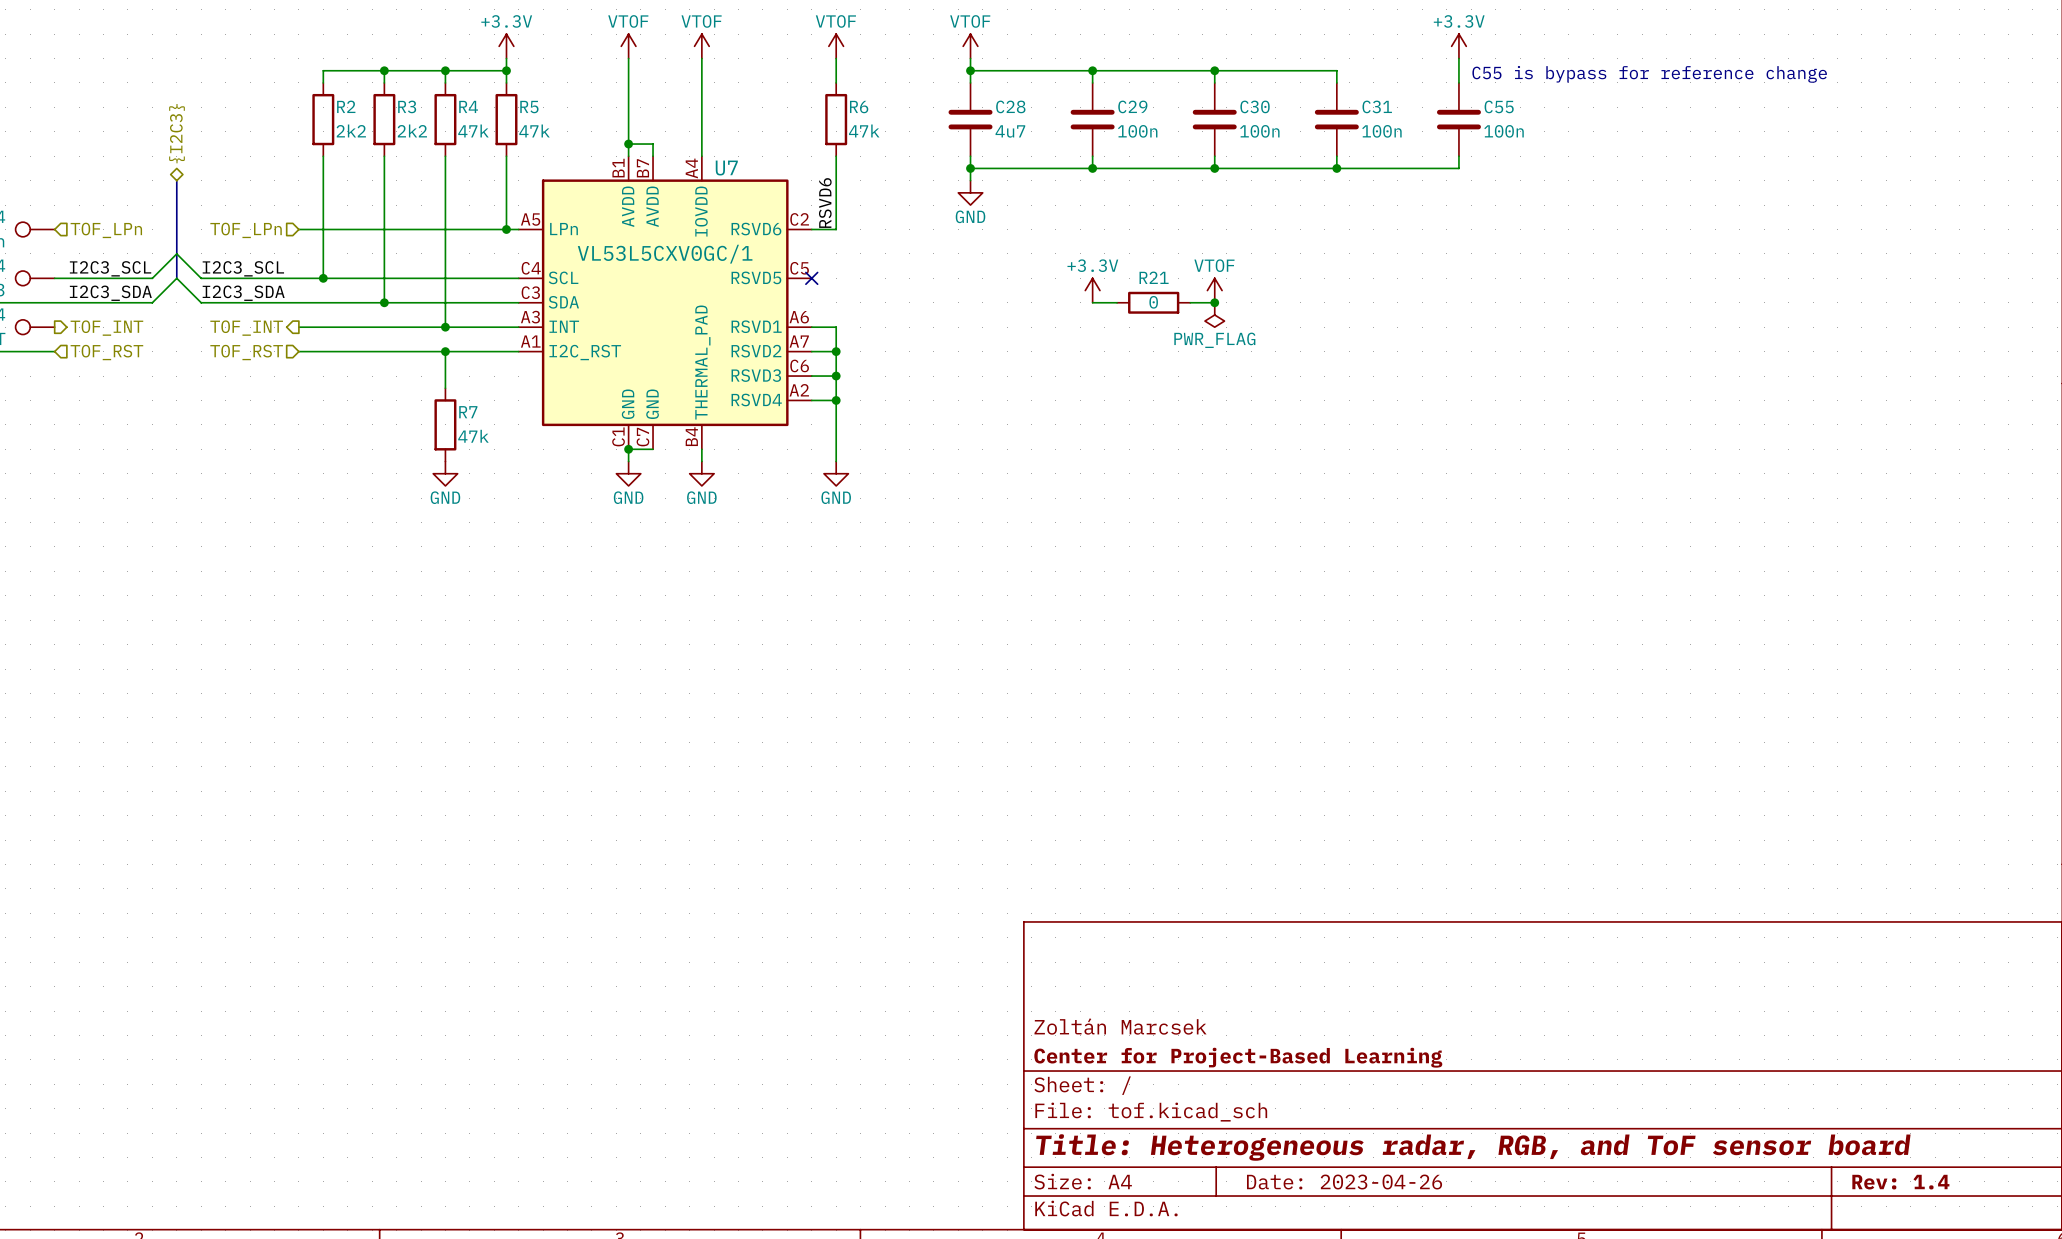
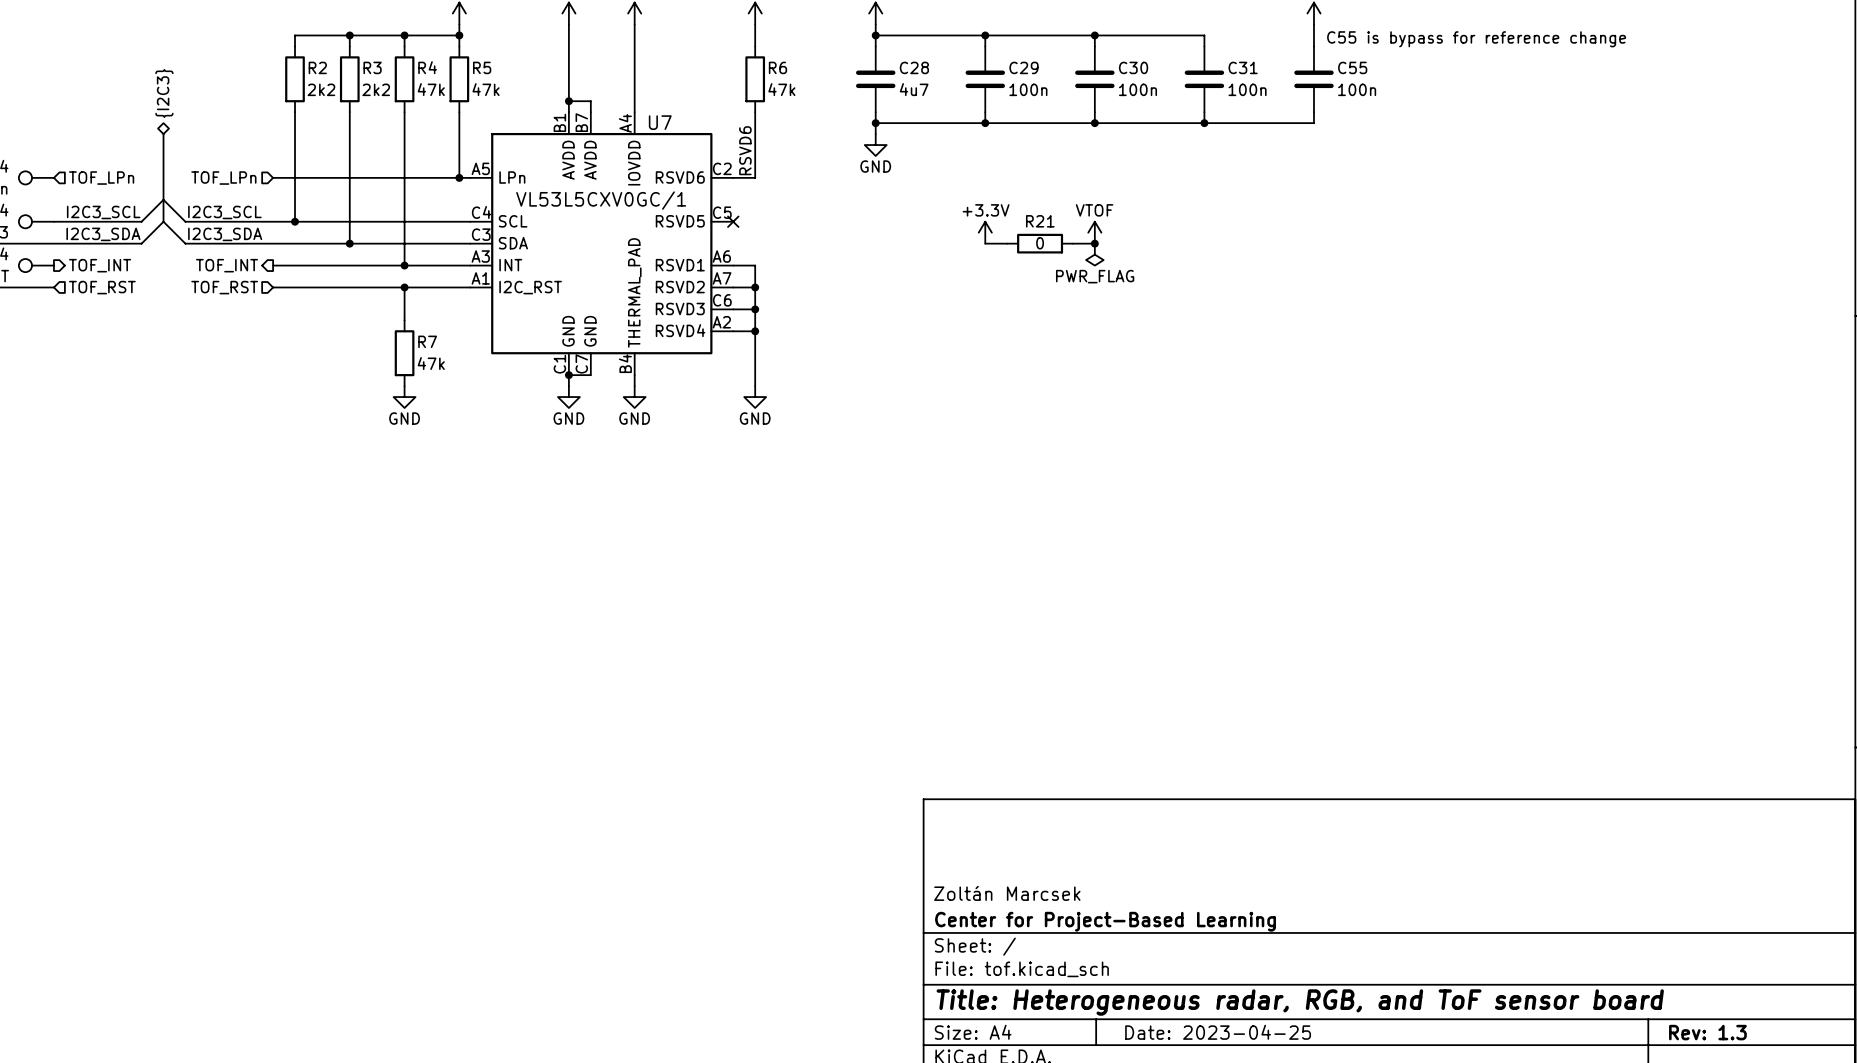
title block: Date: 2023-04-26 (1344, 1182) -> Date: 2023-04-25 (1218, 1032)
title block: Rev: 1.4 (1900, 1182) -> Rev: 1.3 (1707, 1032)

